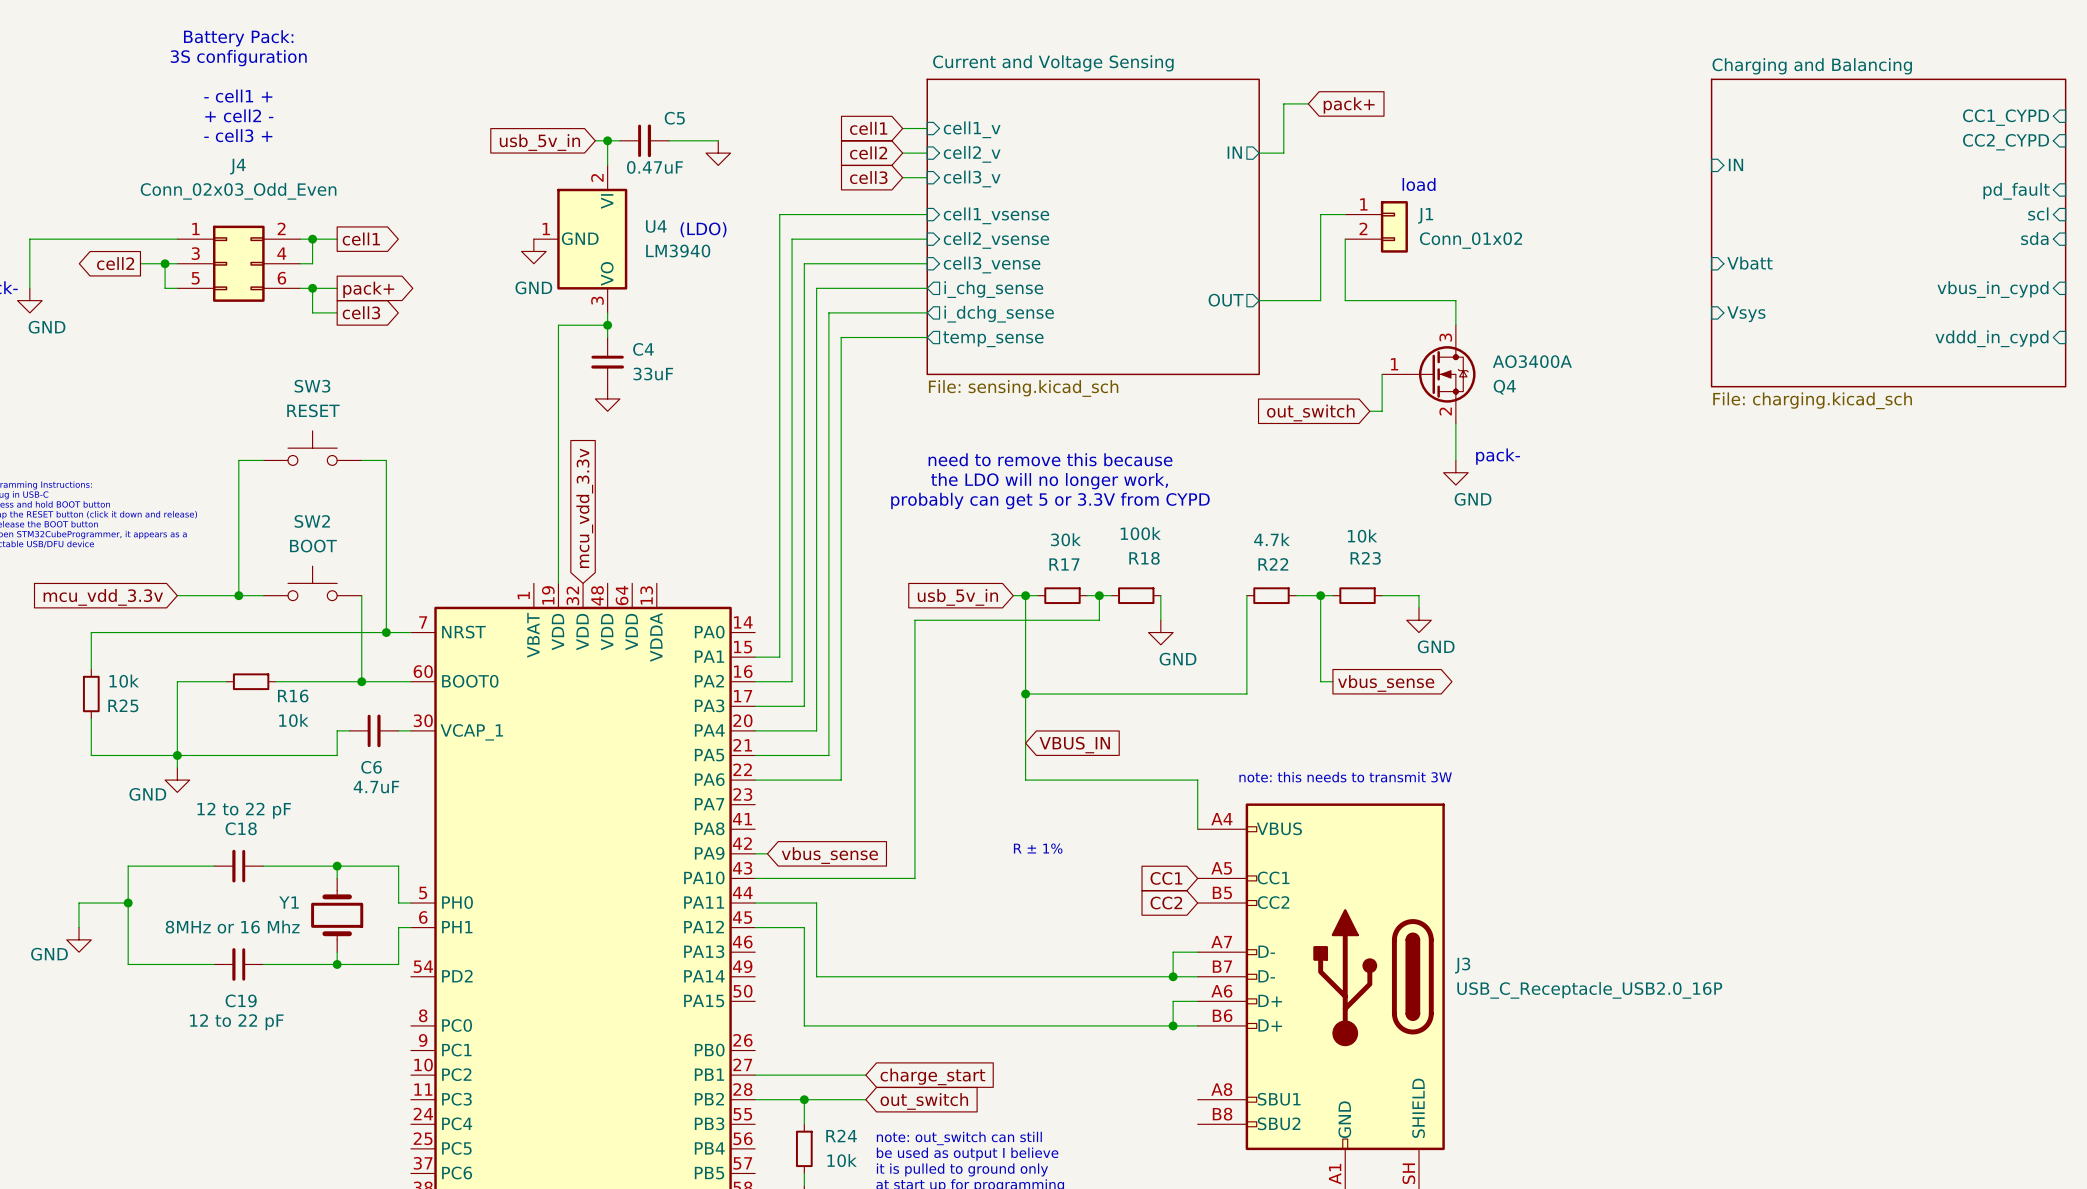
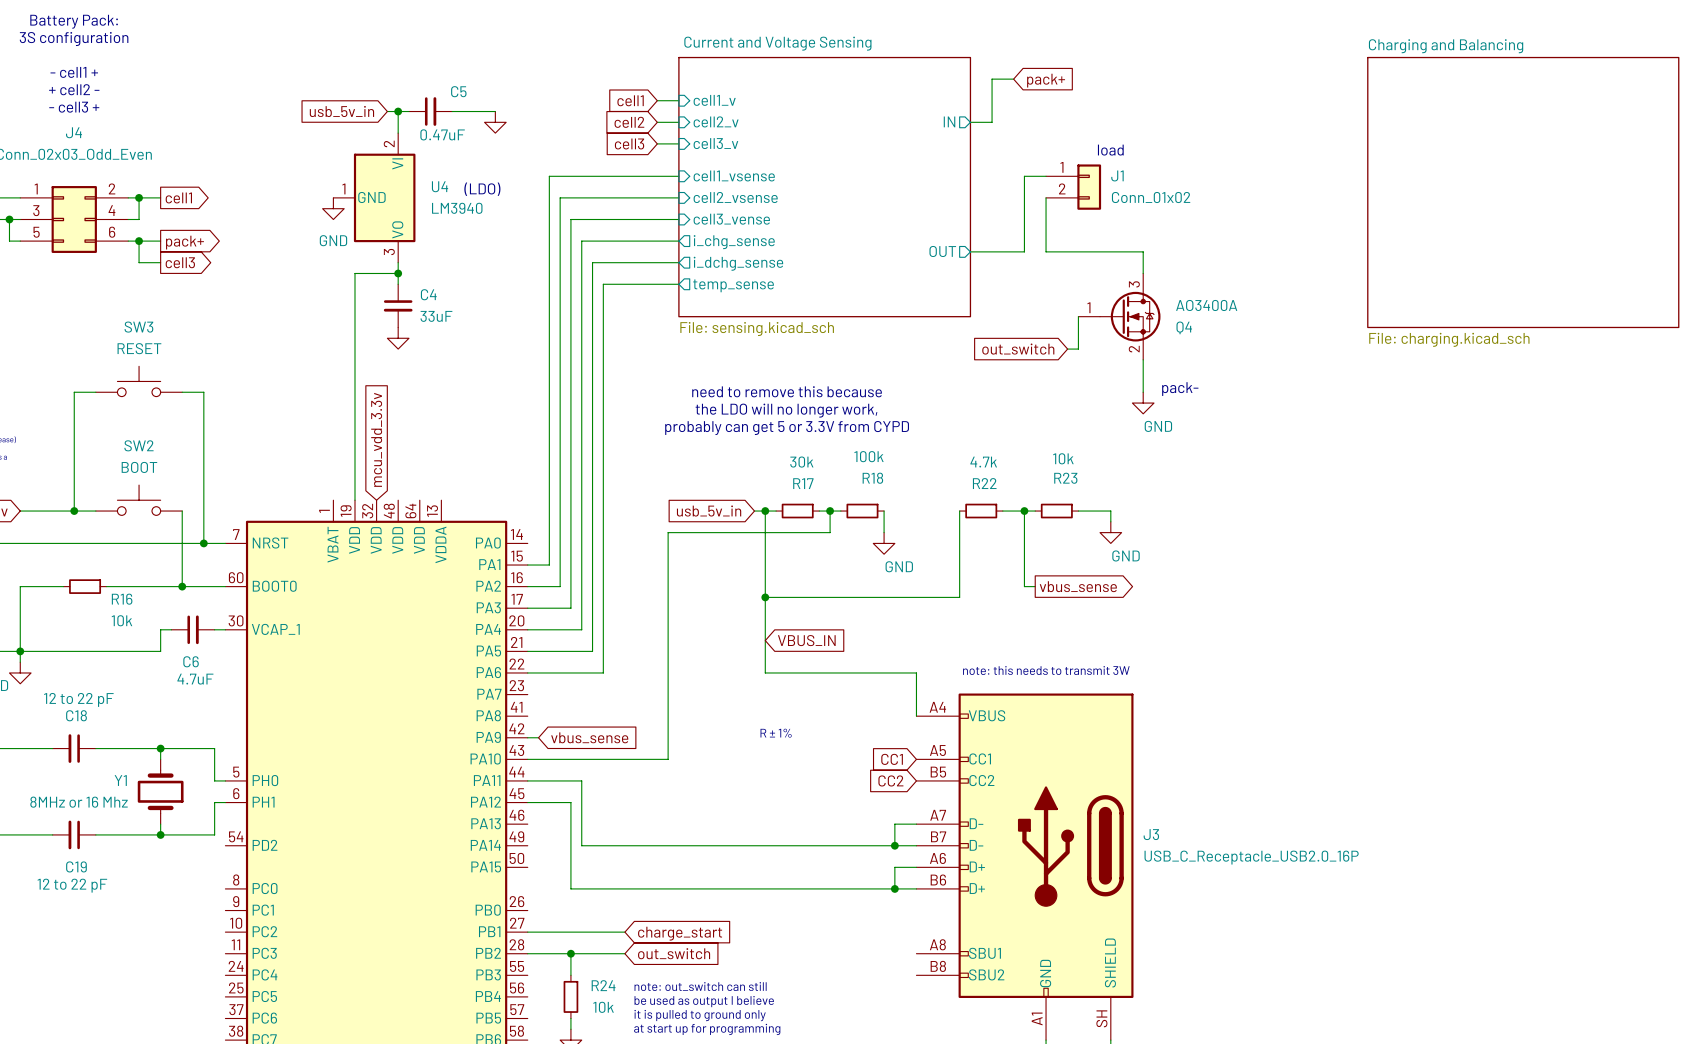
sheet pin: CC1_CYPD (2006, 117) -> none
sheet pin: CC2_CYPD (2006, 142) -> none
sheet pin: IN (1735, 164) -> none
sheet pin: pd_fault (2016, 191) -> none
sheet pin: scl (2038, 213) -> none
sheet pin: sda (2034, 238) -> none
sheet pin: Vbatt (1749, 263) -> none
sheet pin: vbus_in_cypd (1992, 289) -> none
sheet pin: Vsys (1746, 314) -> none
sheet pin: vddd_in_cypd (1992, 338) -> none

